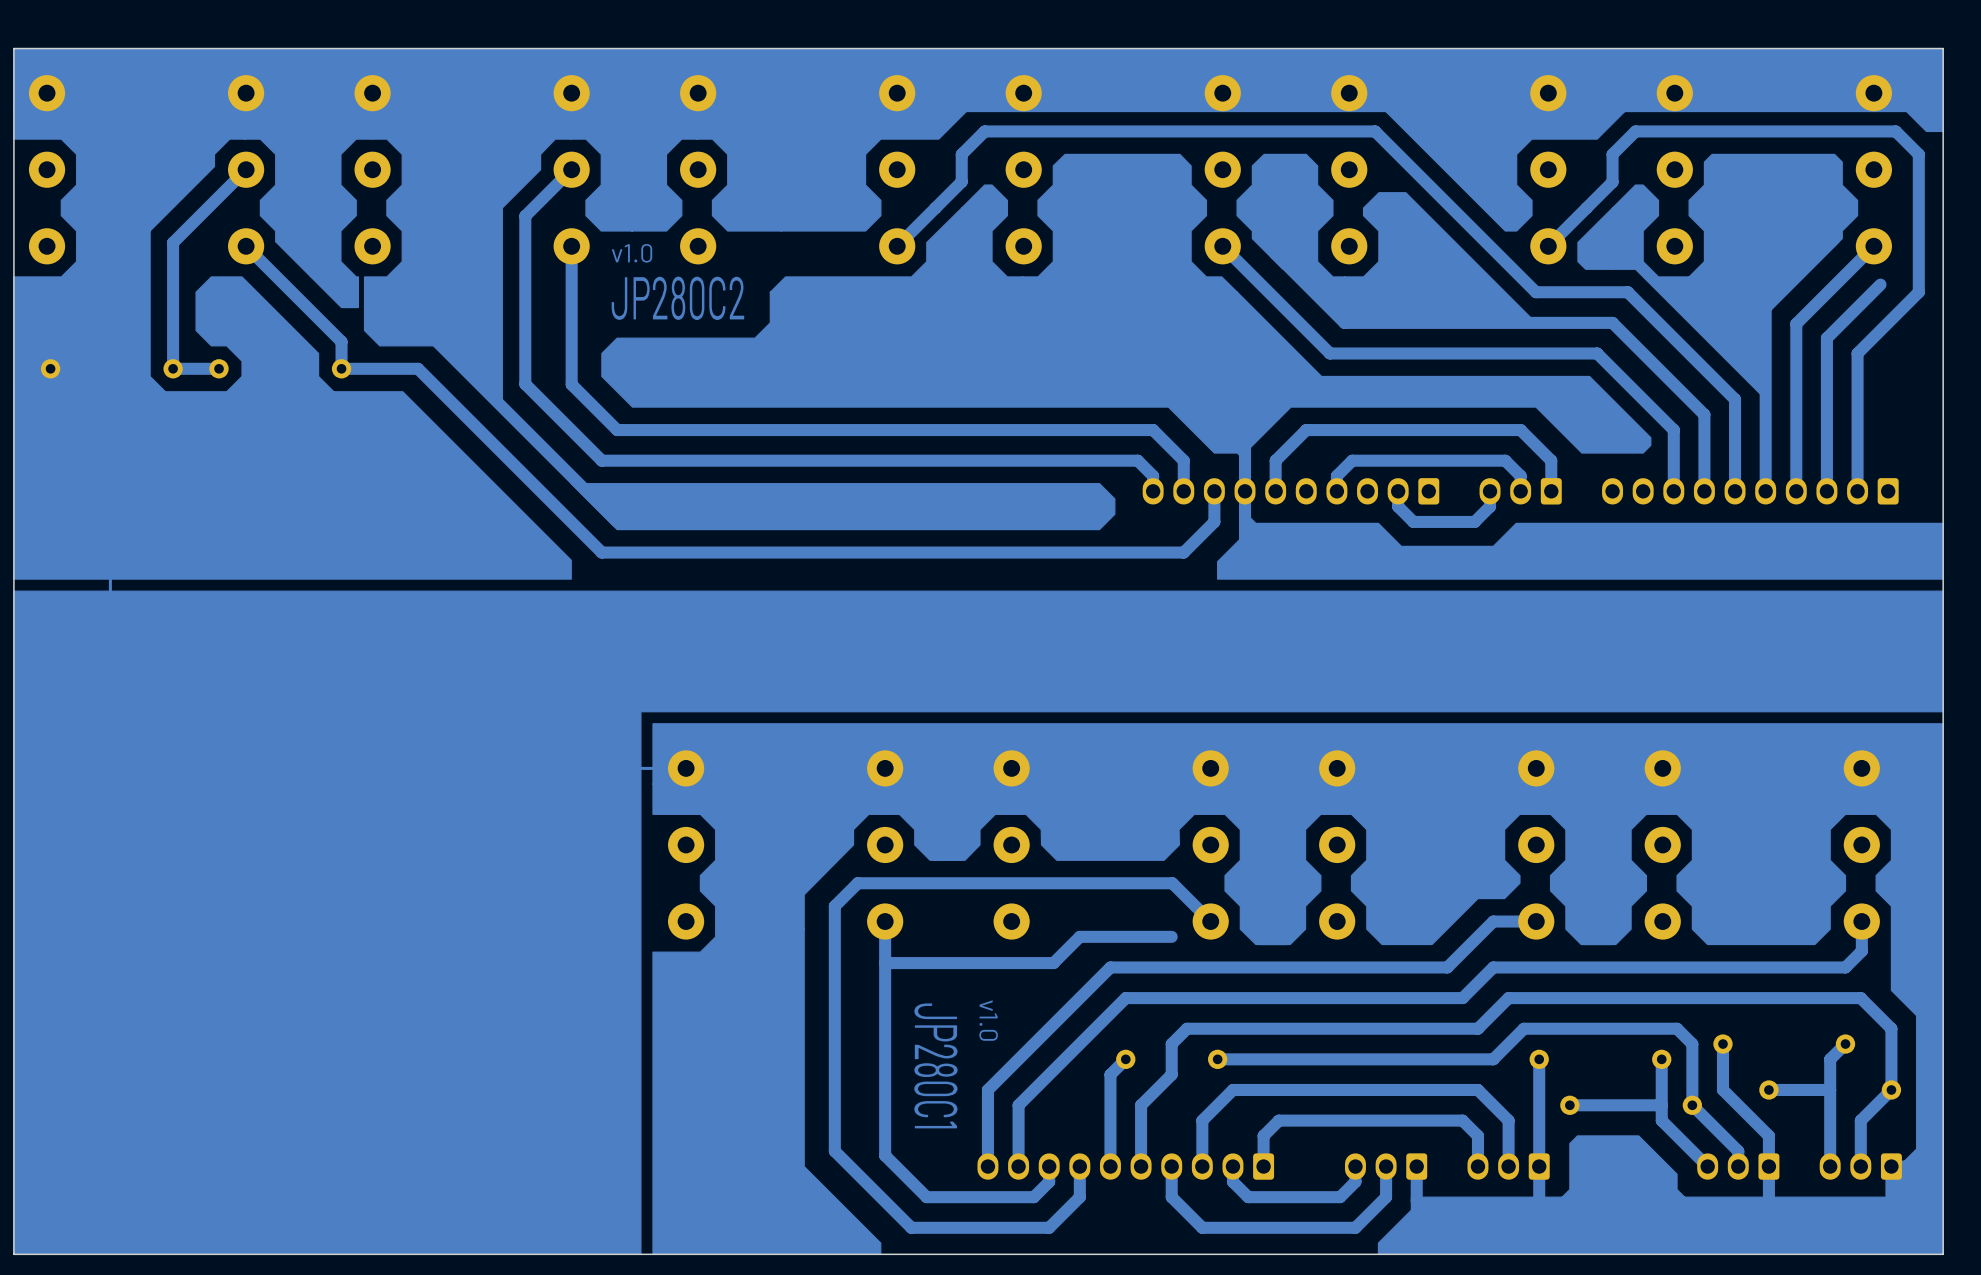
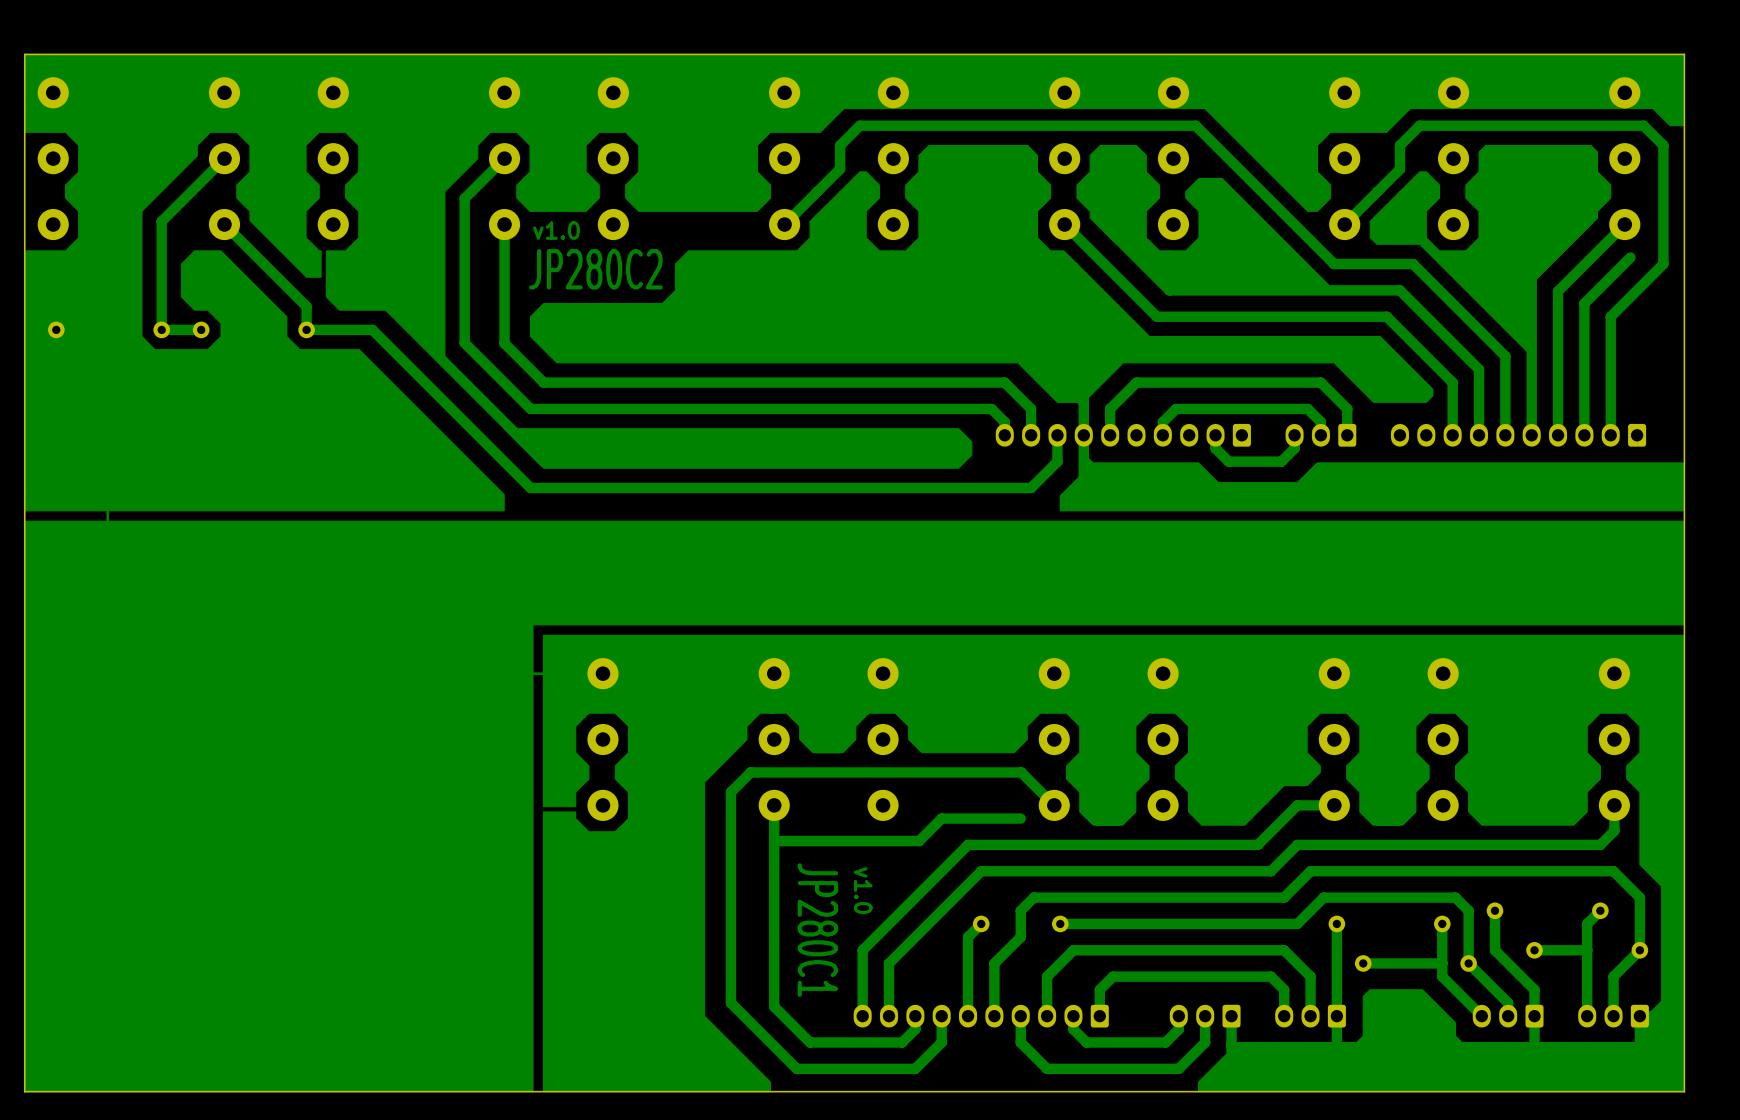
drawing shape: [13, 590, 1944, 1255] -> [24, 520, 1685, 1093]
drawing: none -> [542, 634, 1685, 1093]
drawing: [652, 723, 1944, 1255] -> none

